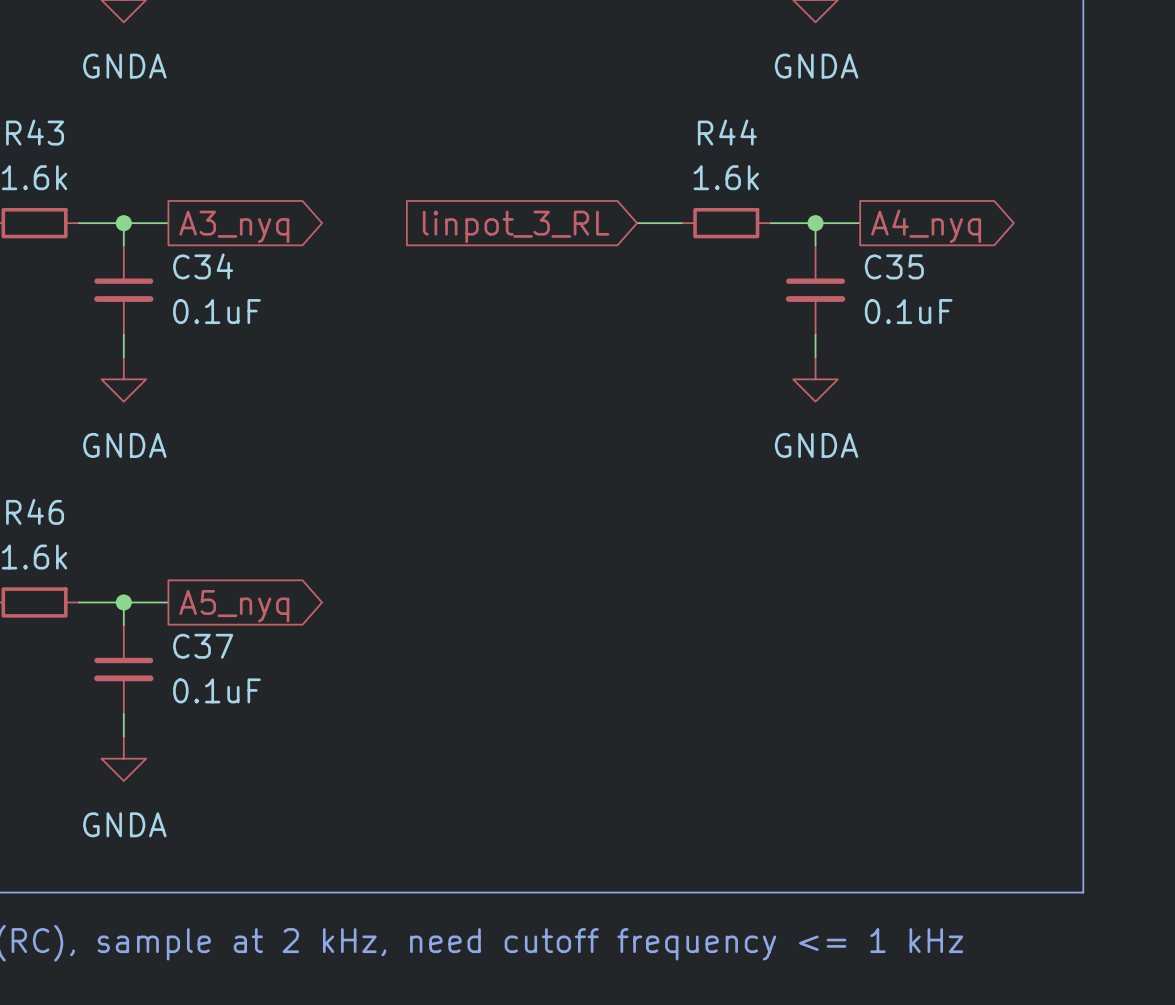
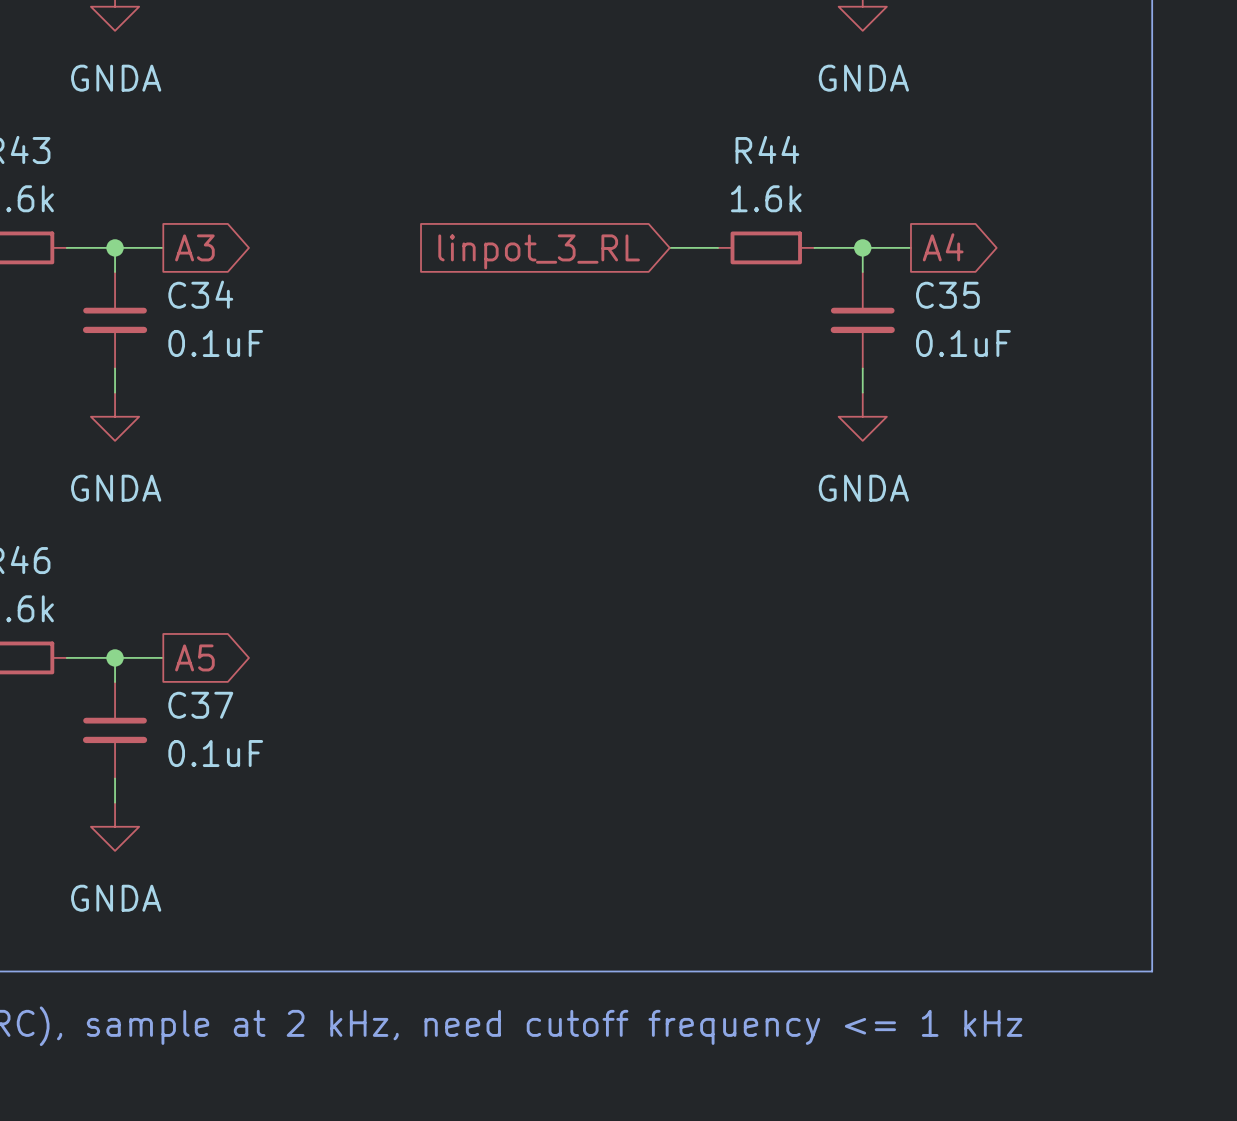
global label: A3_nyq (234, 226) -> A3 (194, 247)
global label: A4_nyq (926, 226) -> A4 (943, 247)
global label: A5_nyq (234, 606) -> A5 (194, 657)

